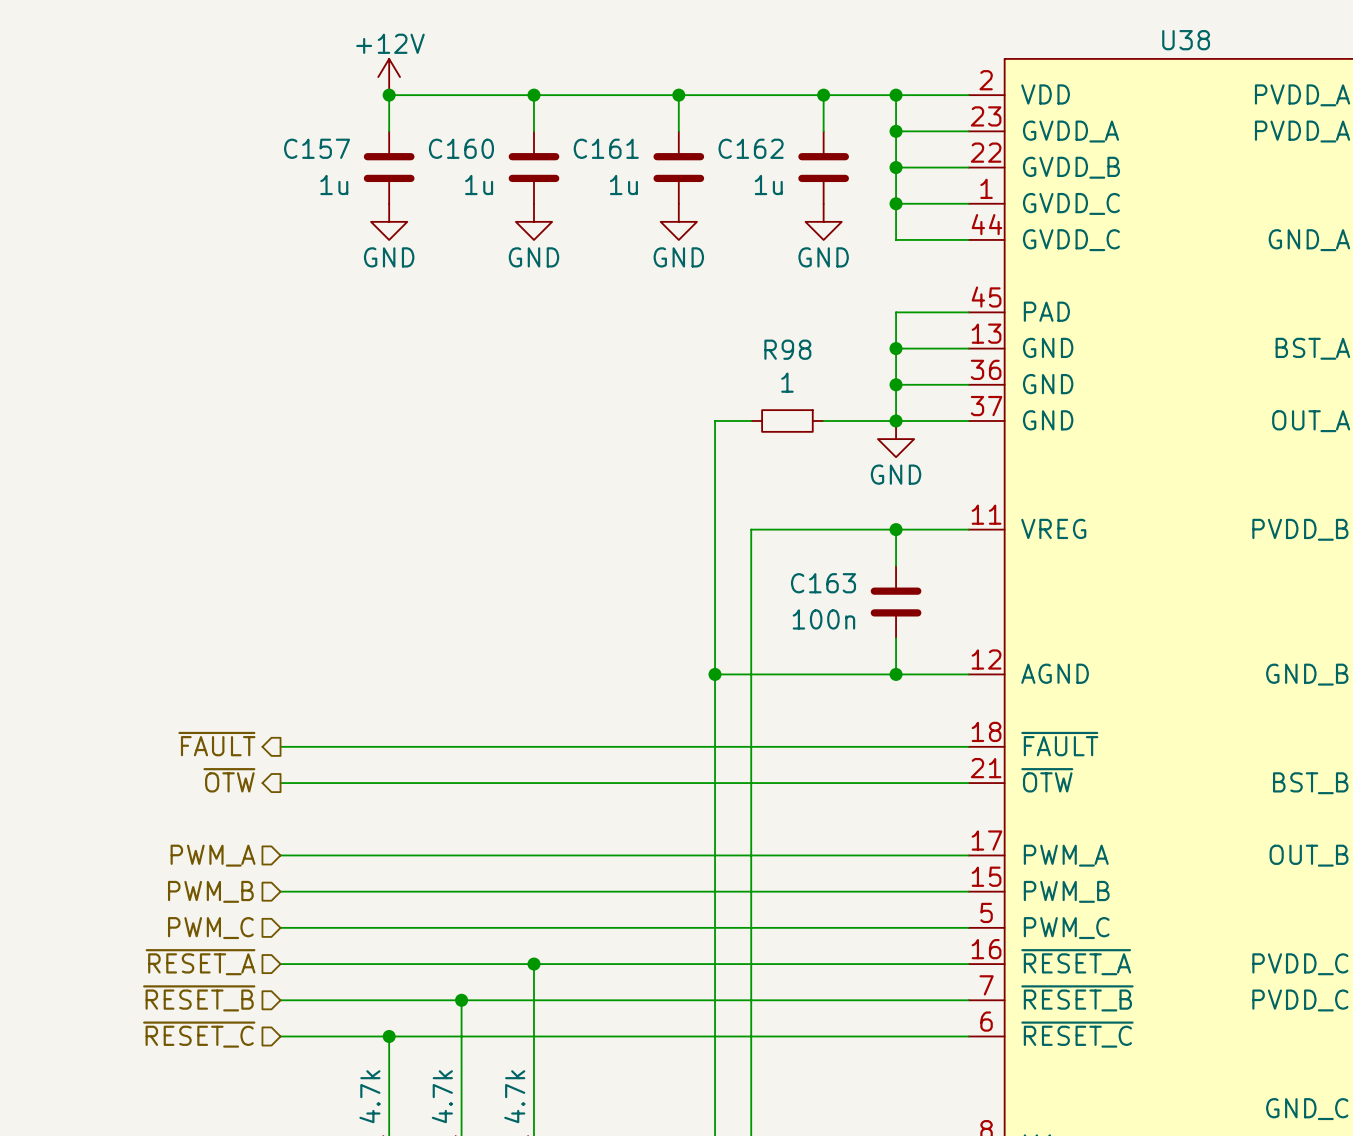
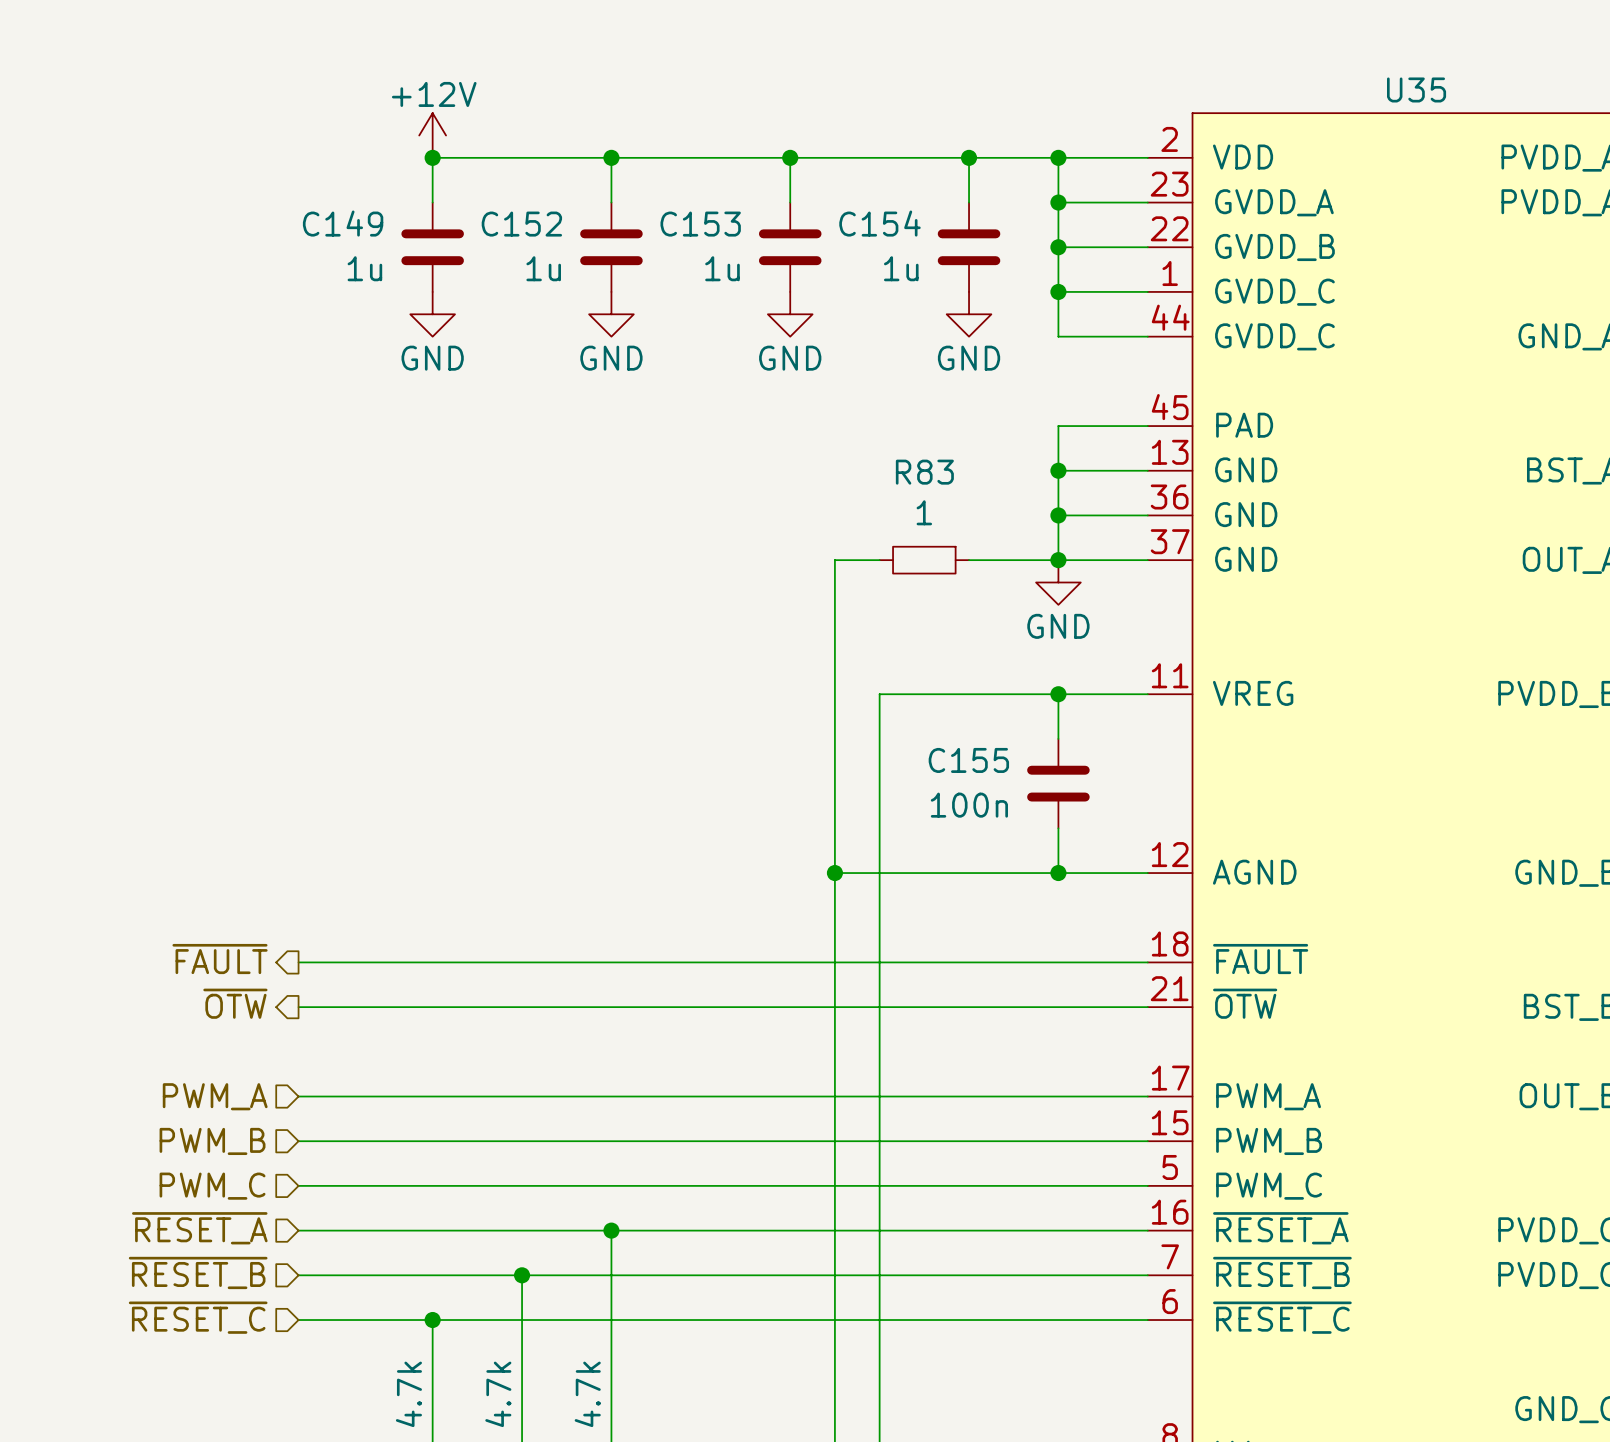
U38 name: U38 (1186, 40) -> U35 (1416, 89)
C157 name: C157 (317, 148) -> C149 (343, 223)
C160 name: C160 (461, 148) -> C152 (521, 224)
C161 name: C161 (606, 148) -> C153 (700, 224)
C162 name: C162 (751, 148) -> C154 (879, 223)
R98 name: R98 (787, 349) -> R83 (924, 472)
C163 name: C163 (823, 583) -> C155 (968, 760)

